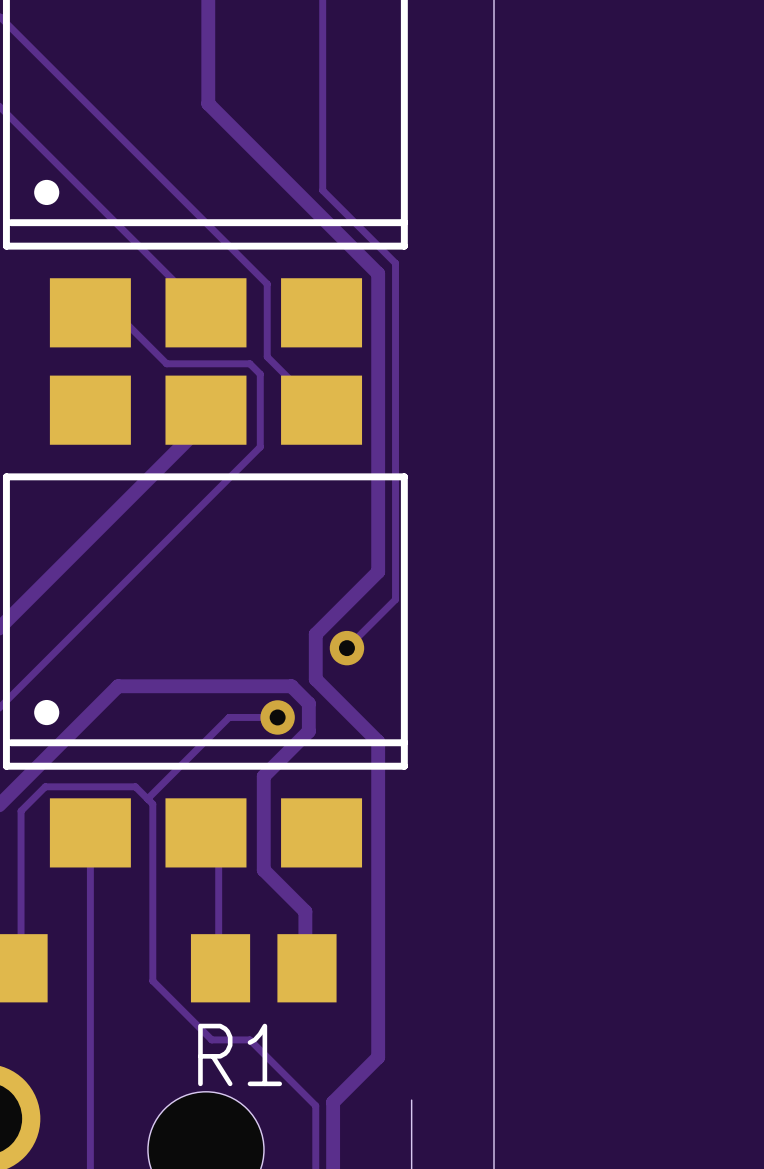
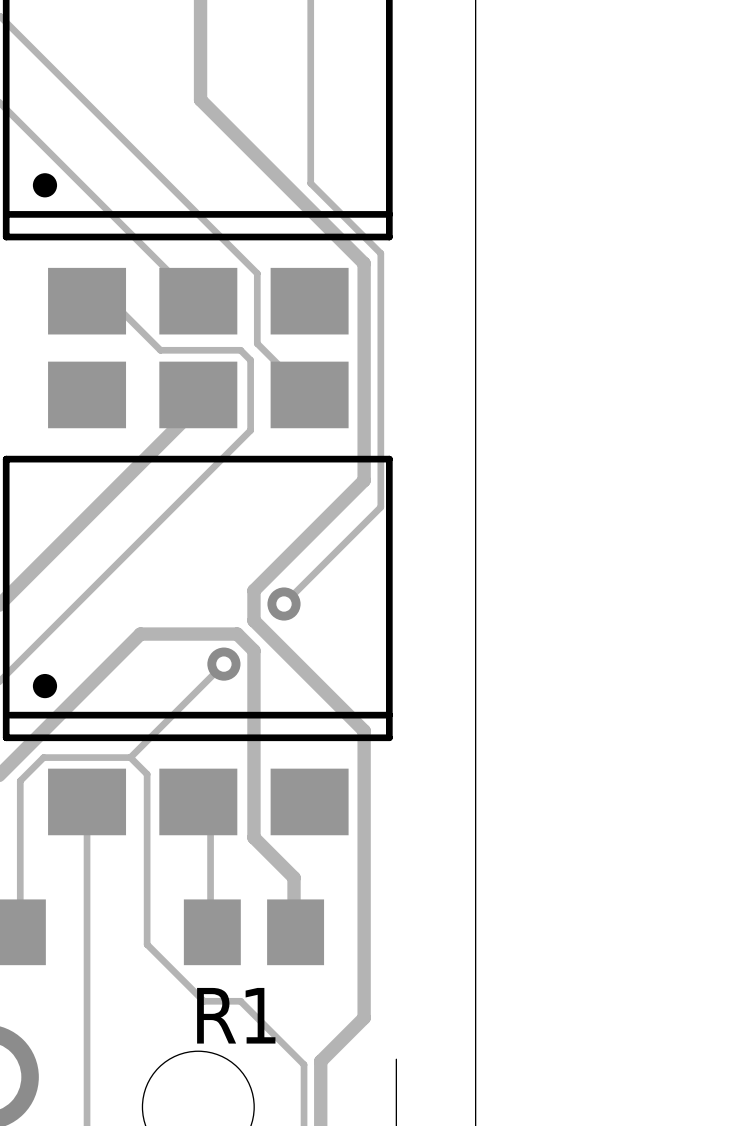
track: (378, 499) (378, 571) (315, 634) (315, 679) (378, 741) (378, 759) -> (364, 480) (253, 590) (253, 620) (364, 730)
track: (395, 526) (395, 599) (346, 648) -> (380, 507) (284, 604)
via: none -> (284, 604)
via: (346, 648) -> none
track: (118, 686) (291, 686) (308, 703) (308, 731) (263, 776) -> (113, 660) (140, 634) (237, 634) (253, 650) (253, 747)
track: none -> (223, 664) (130, 757)
via: none -> (223, 664)
track: (277, 717) (229, 717) (147, 798) -> none
via: (277, 717) -> none

